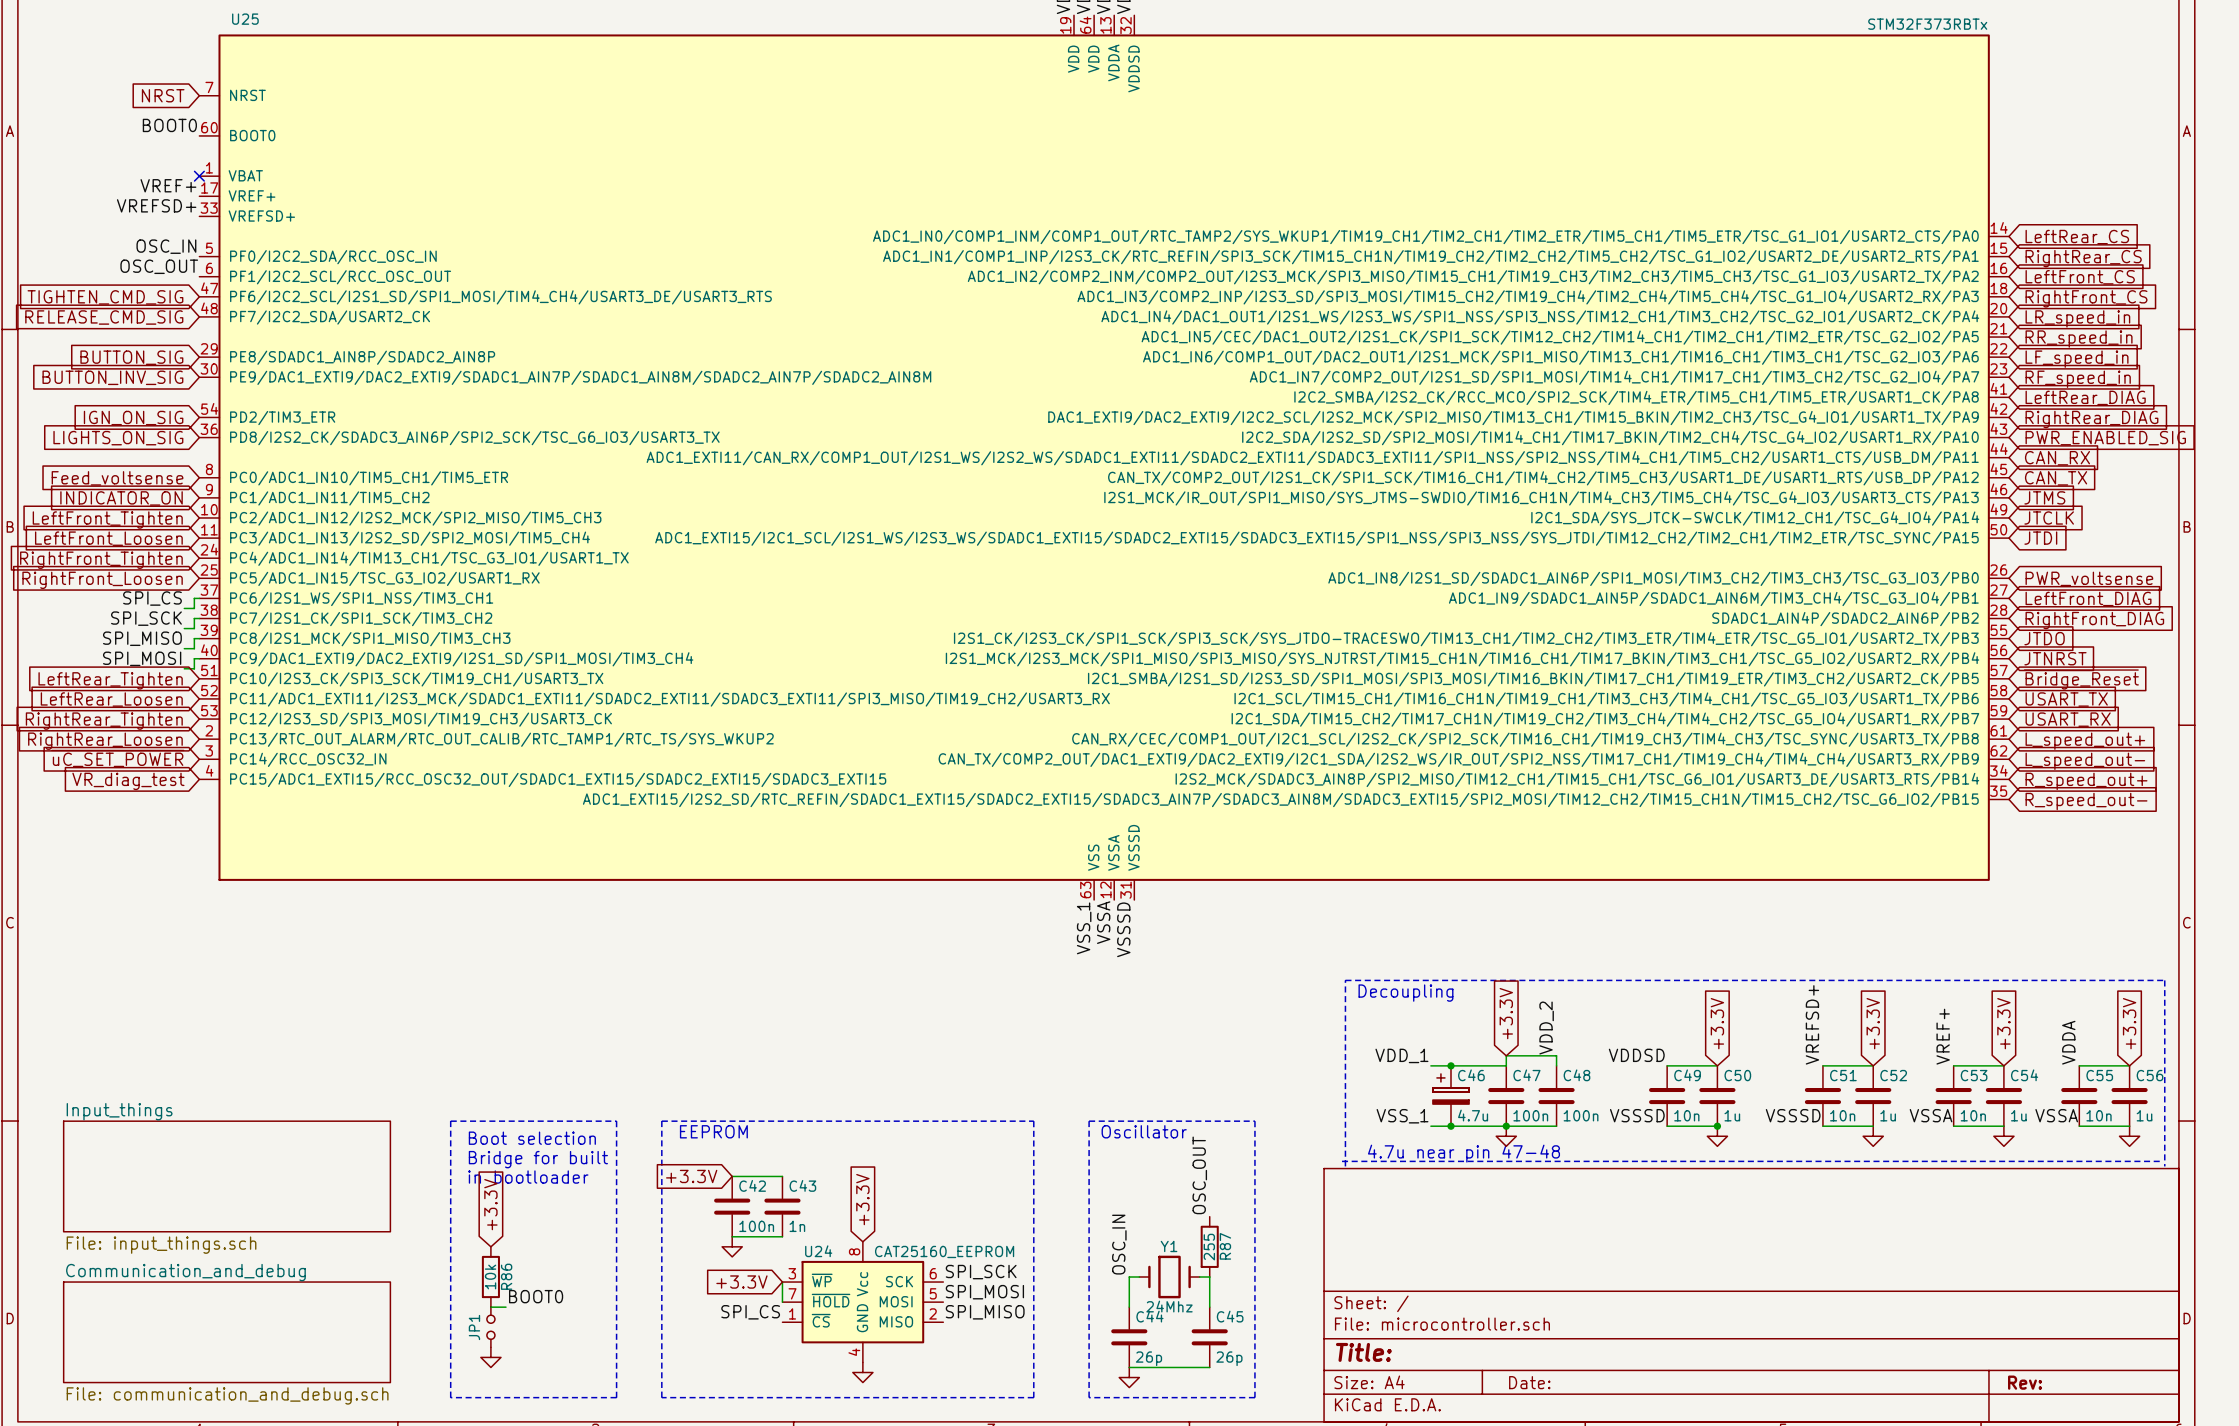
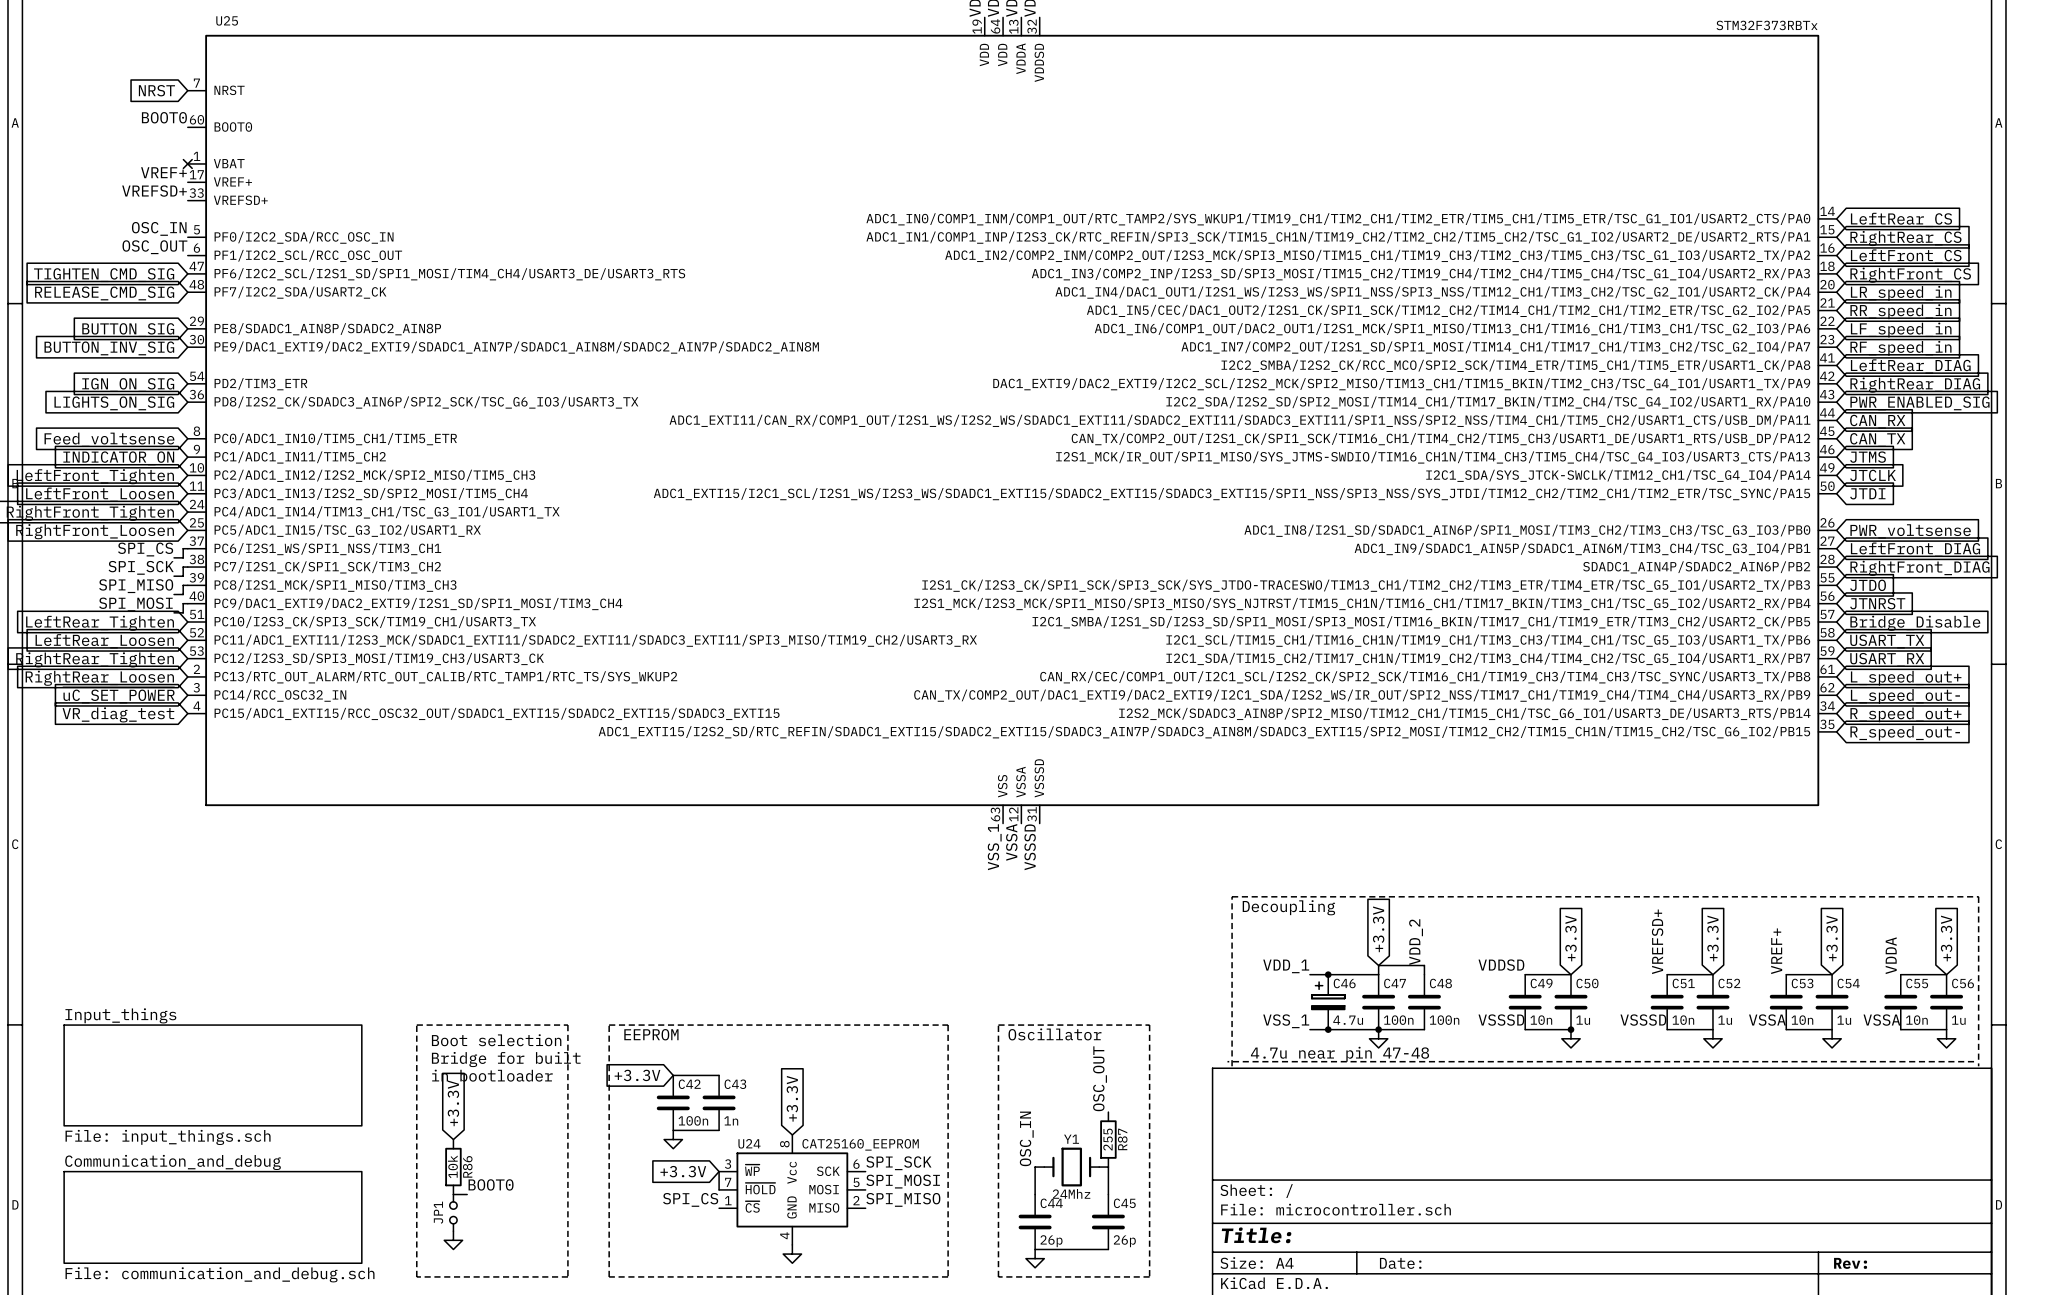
global label: ~{Bridge_Reset} (2081, 679) -> Bridge_Disable (1915, 623)

